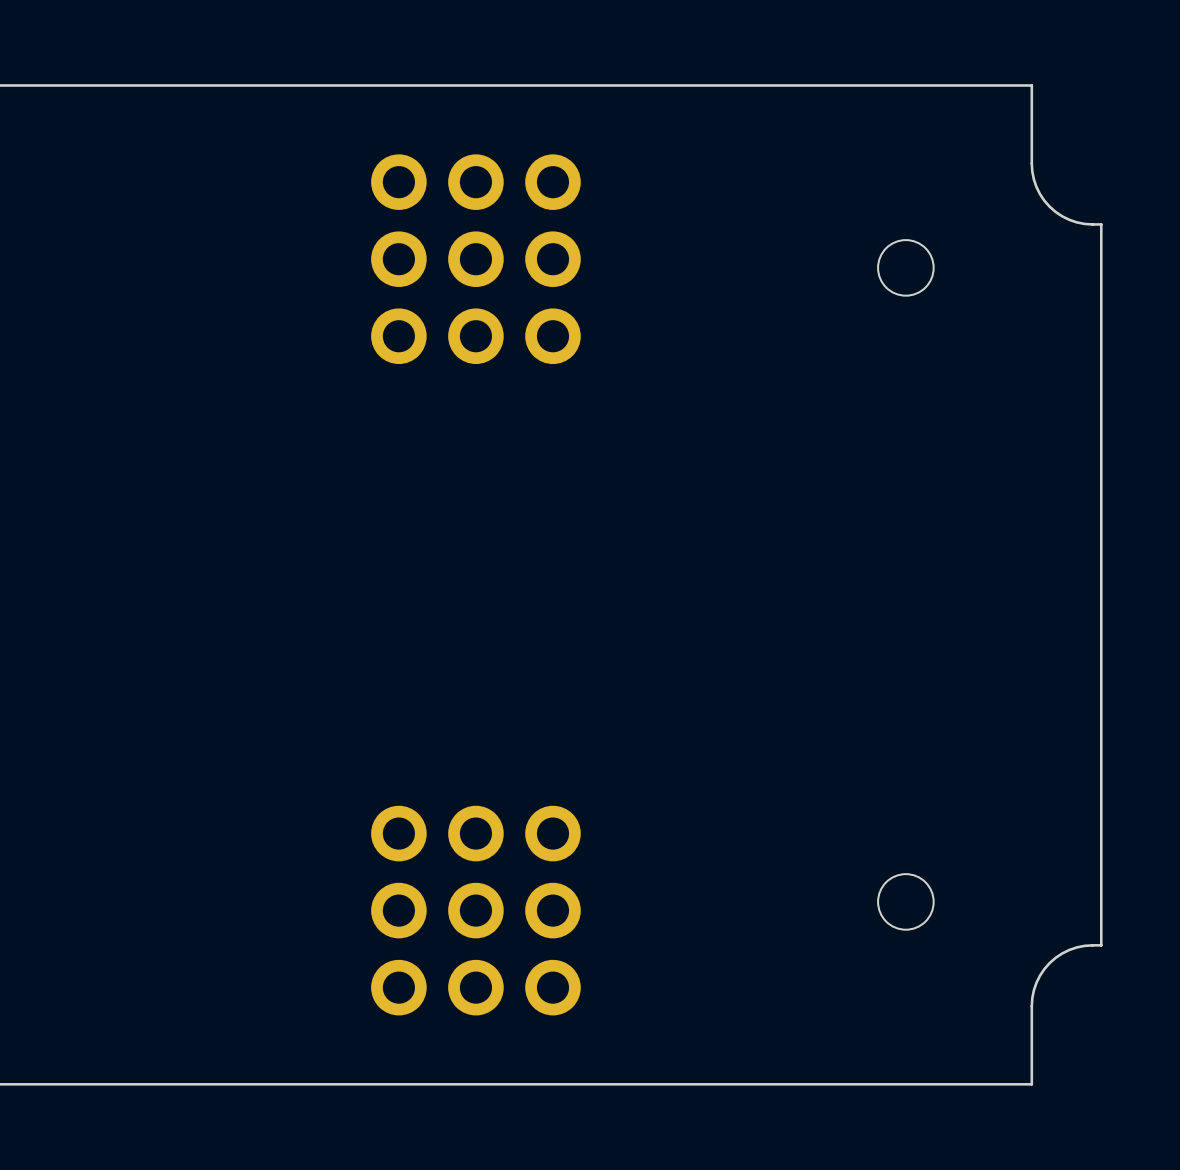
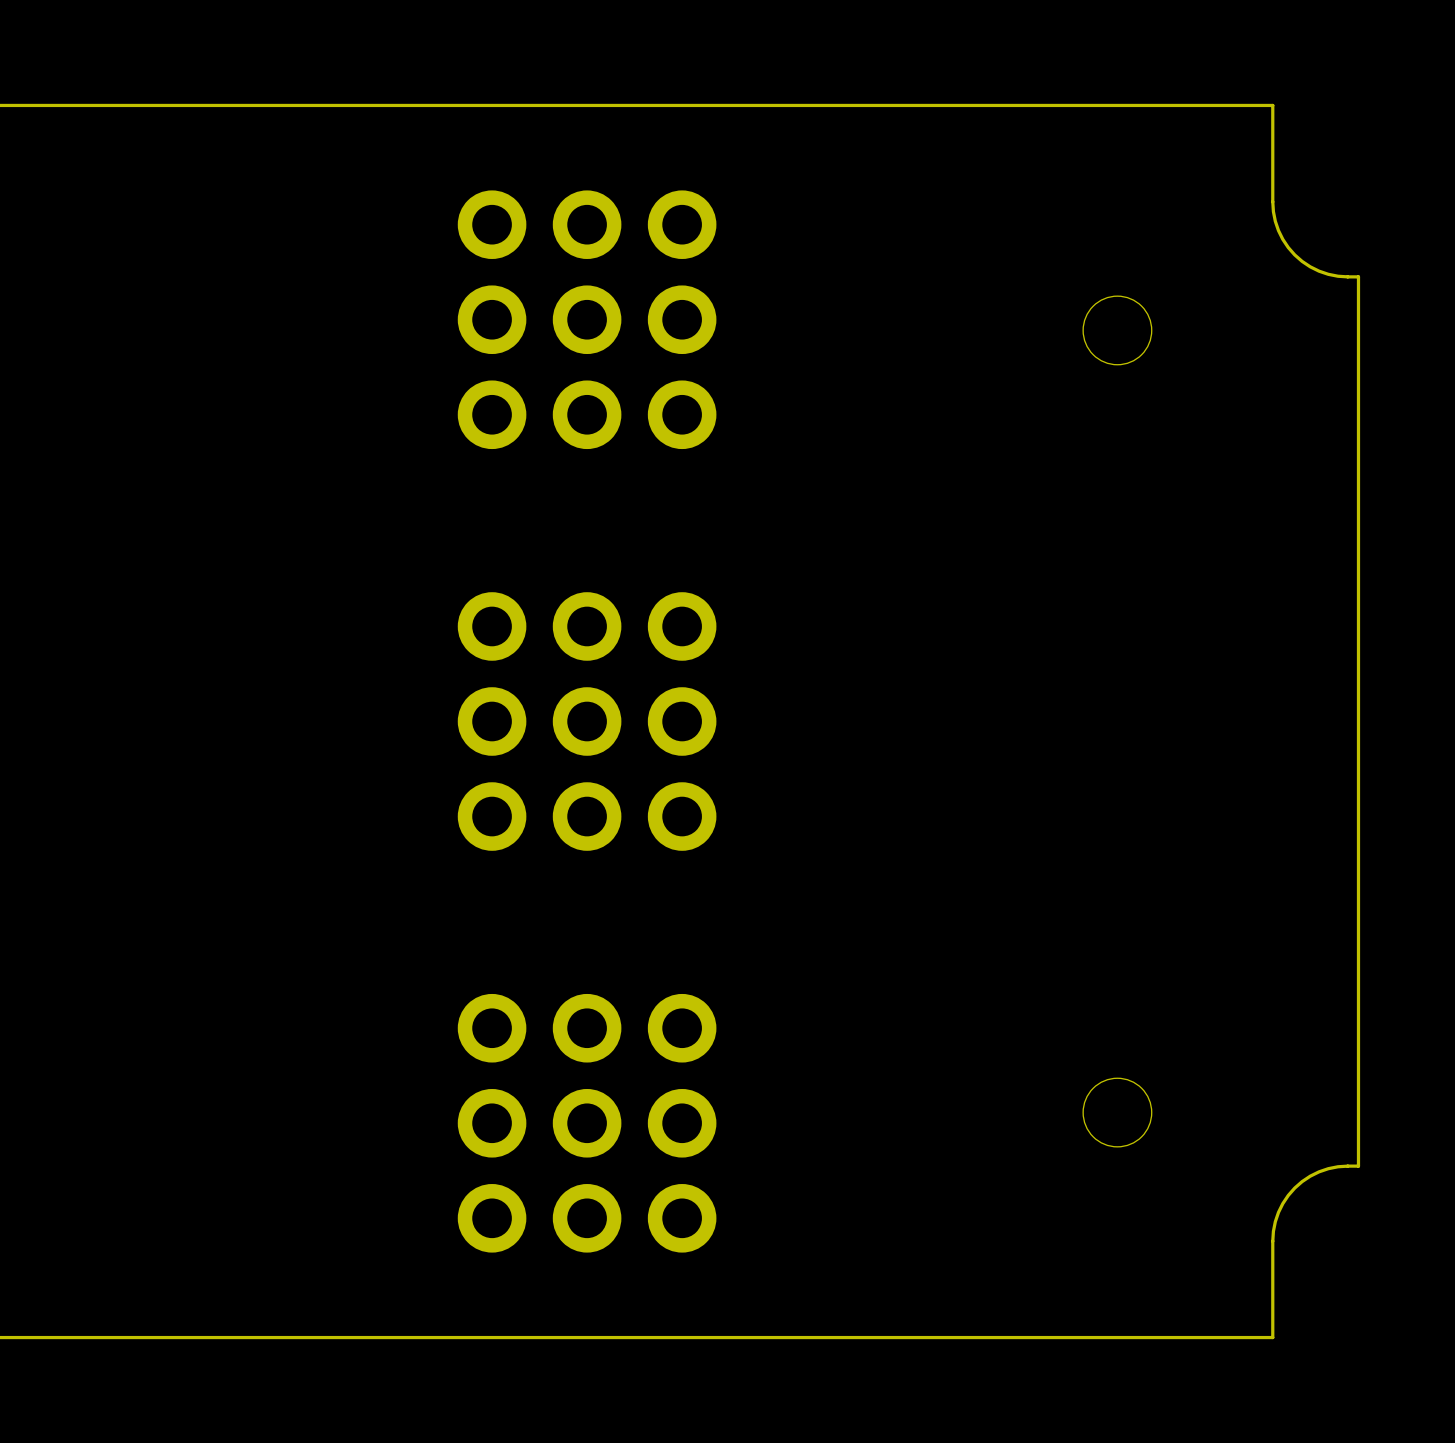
part: none -> (587, 721)

